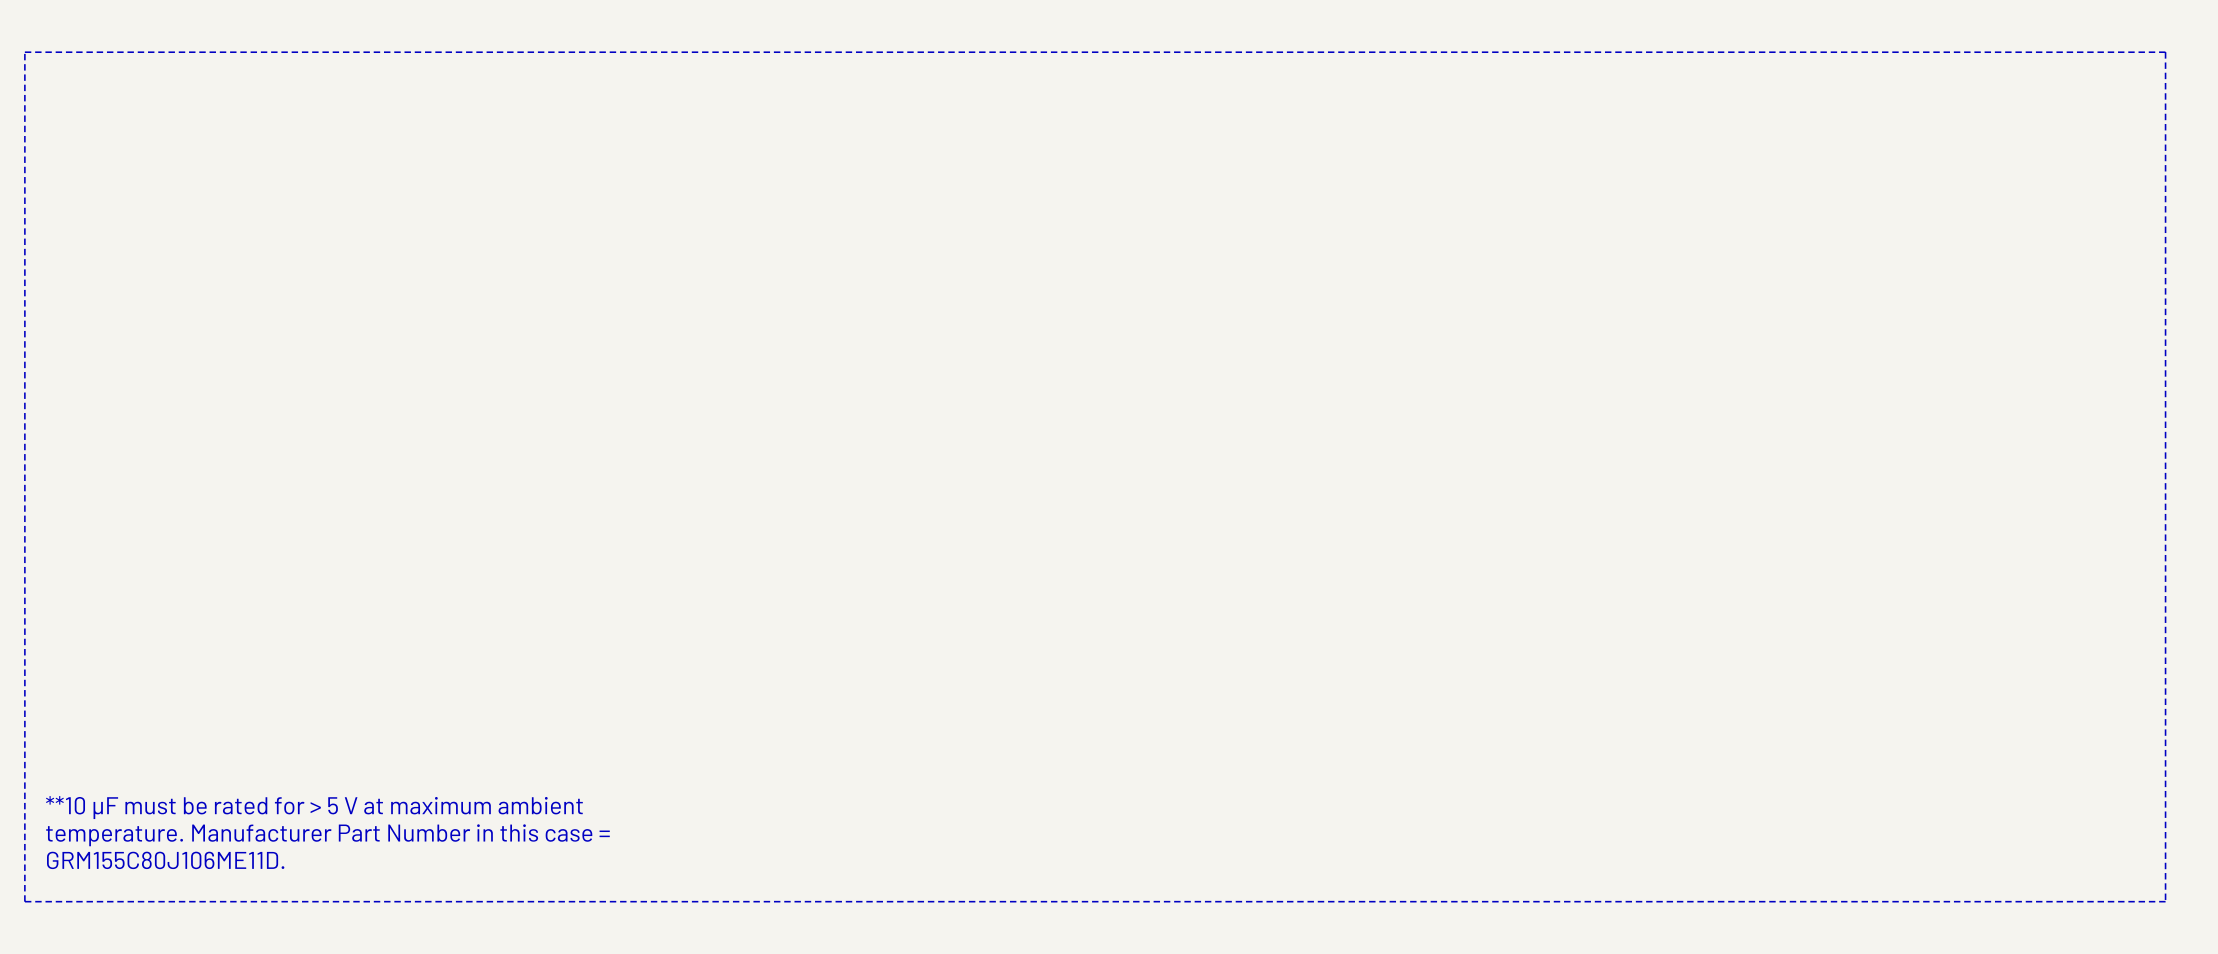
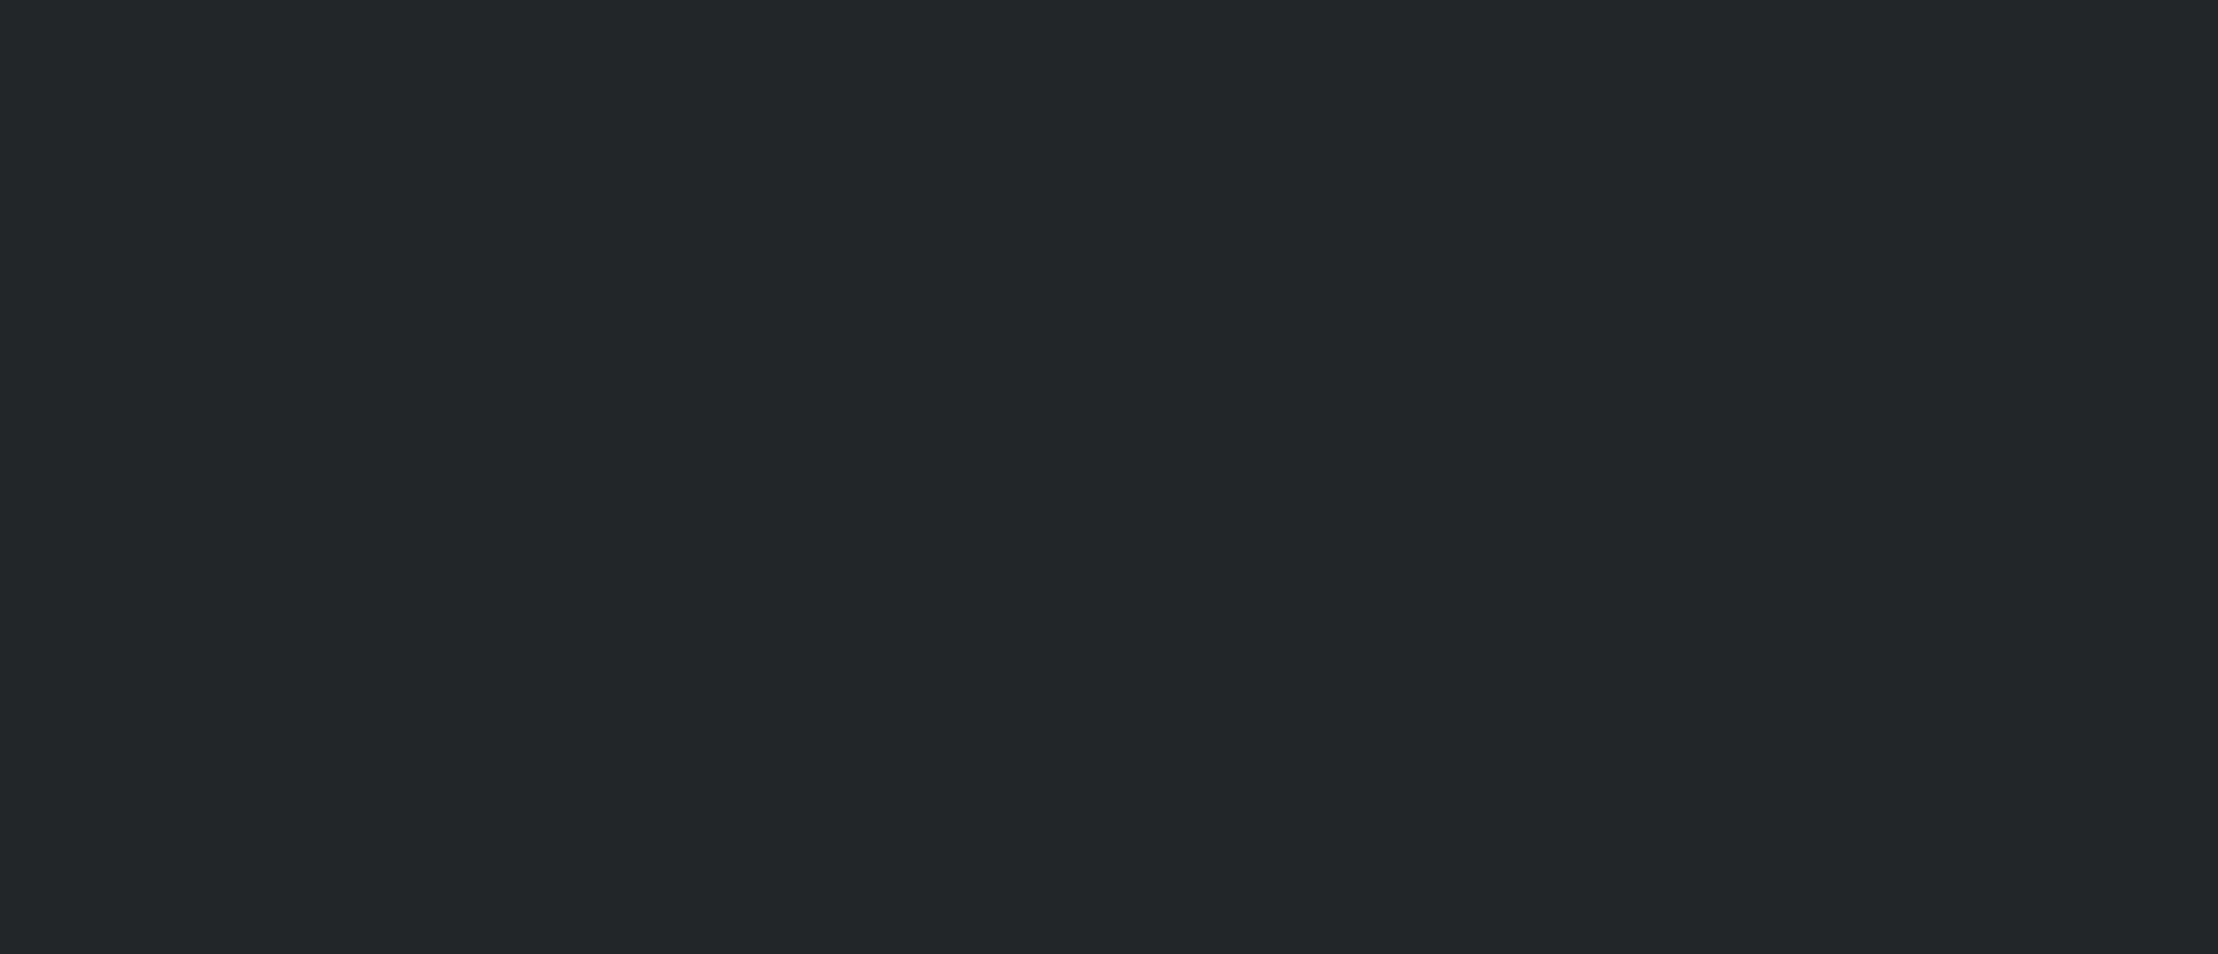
line: (24, 52) (2165, 52) (2165, 901) (24, 901) (24, 52) -> none
text: **10 μF must be rated for > 5 V at maximum ambient (314, 807) -> none
text: temperature. Manufacturer Part Number in this case = (327, 835) -> none
text: GRM155C80J106ME11D. (165, 860) -> none

